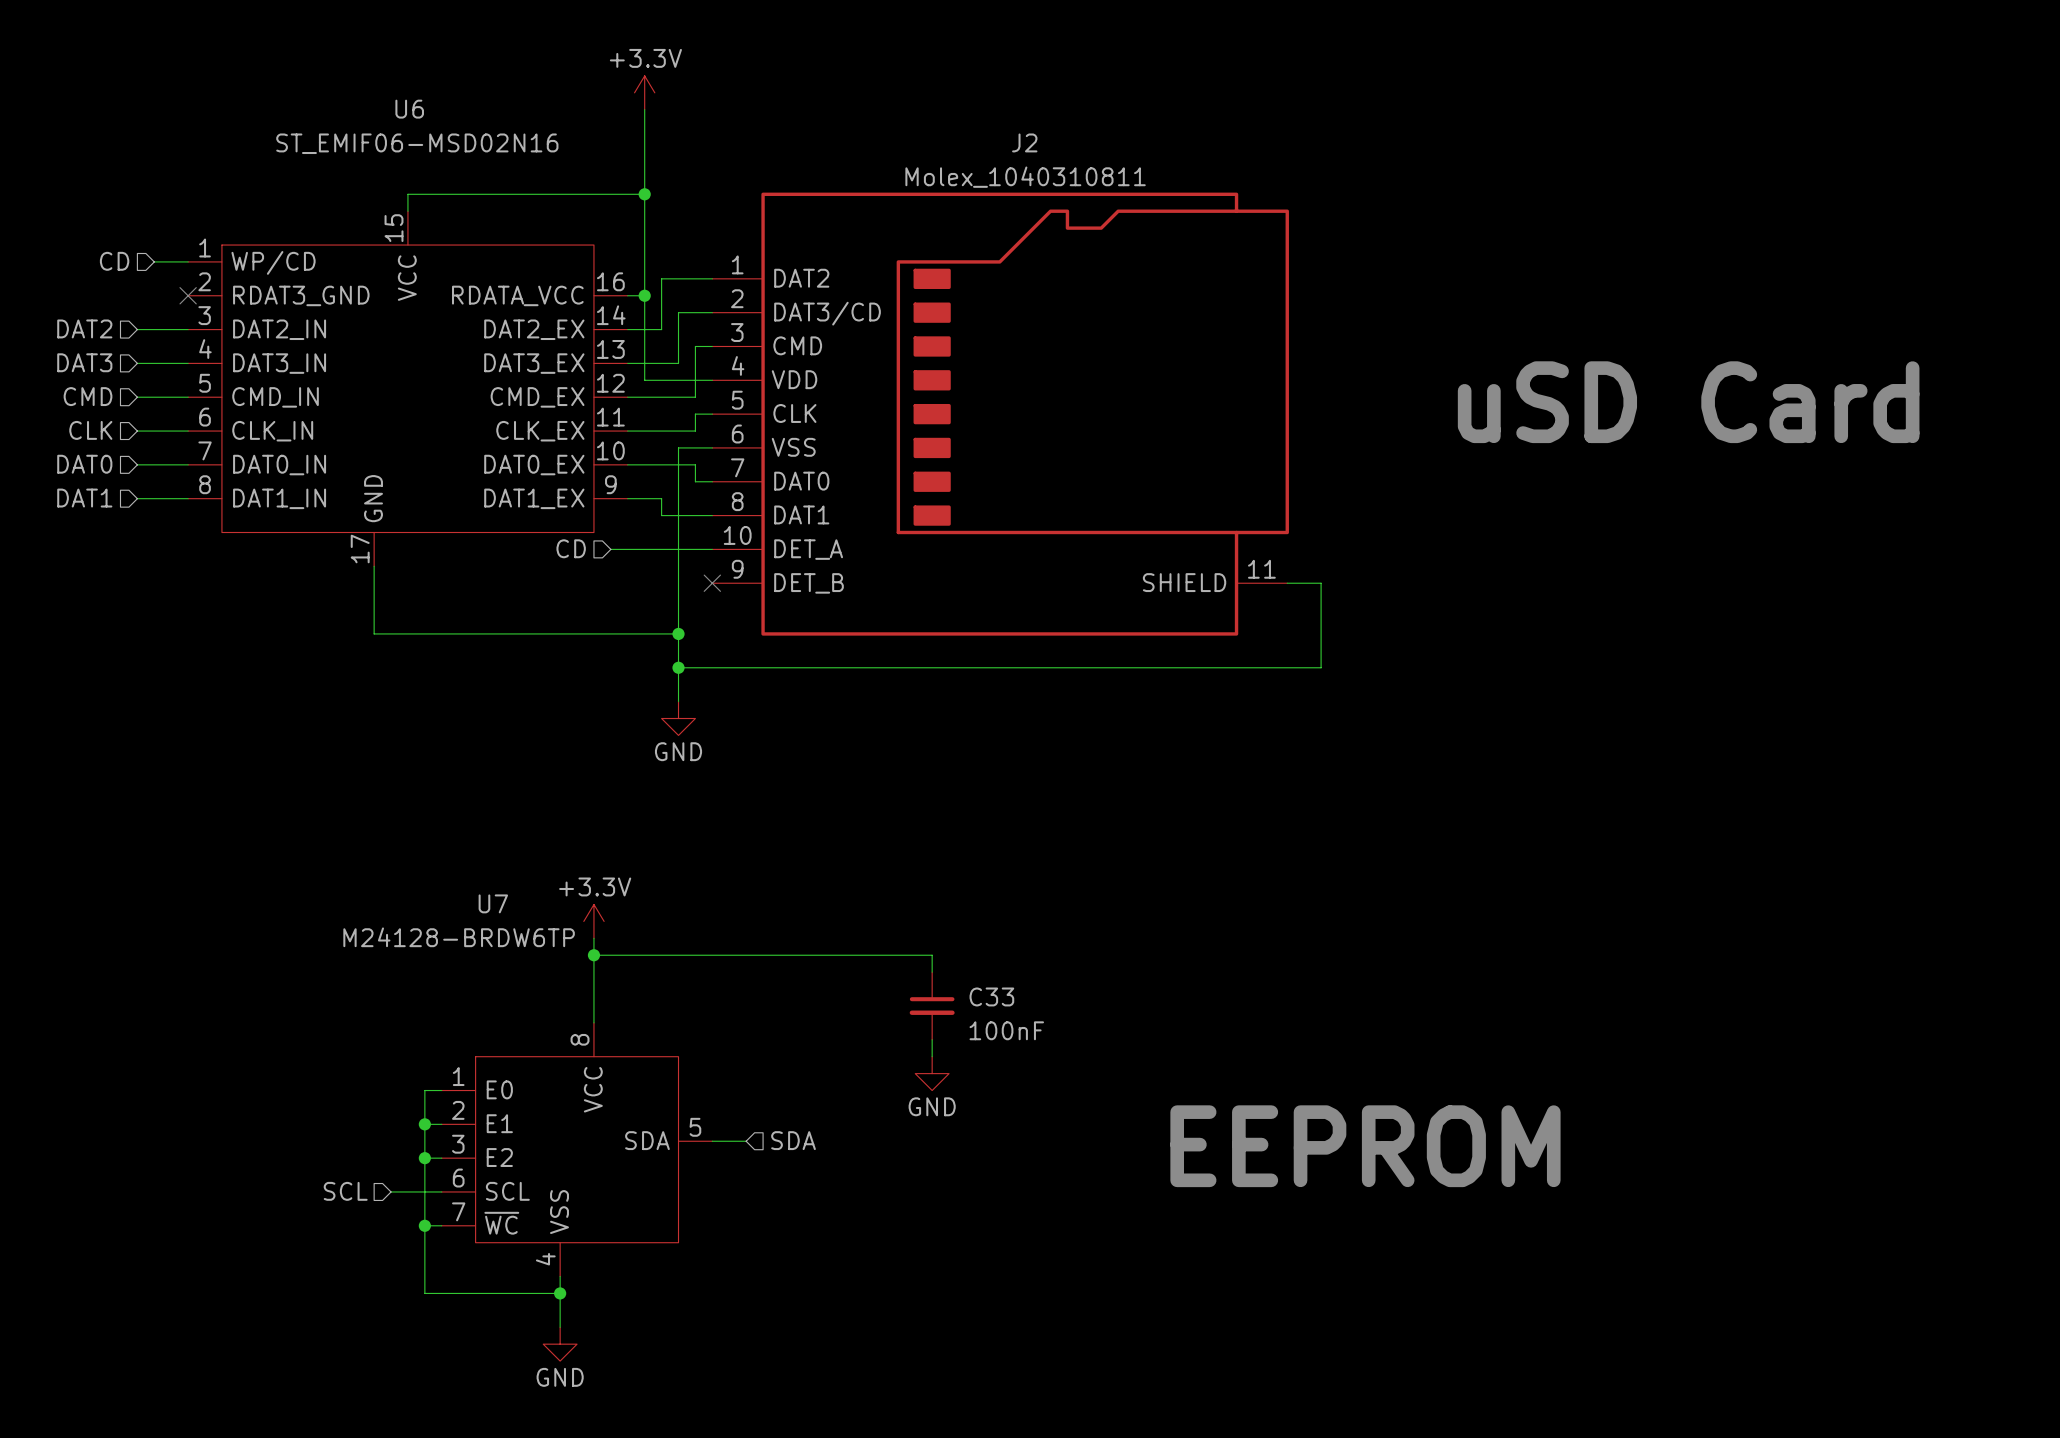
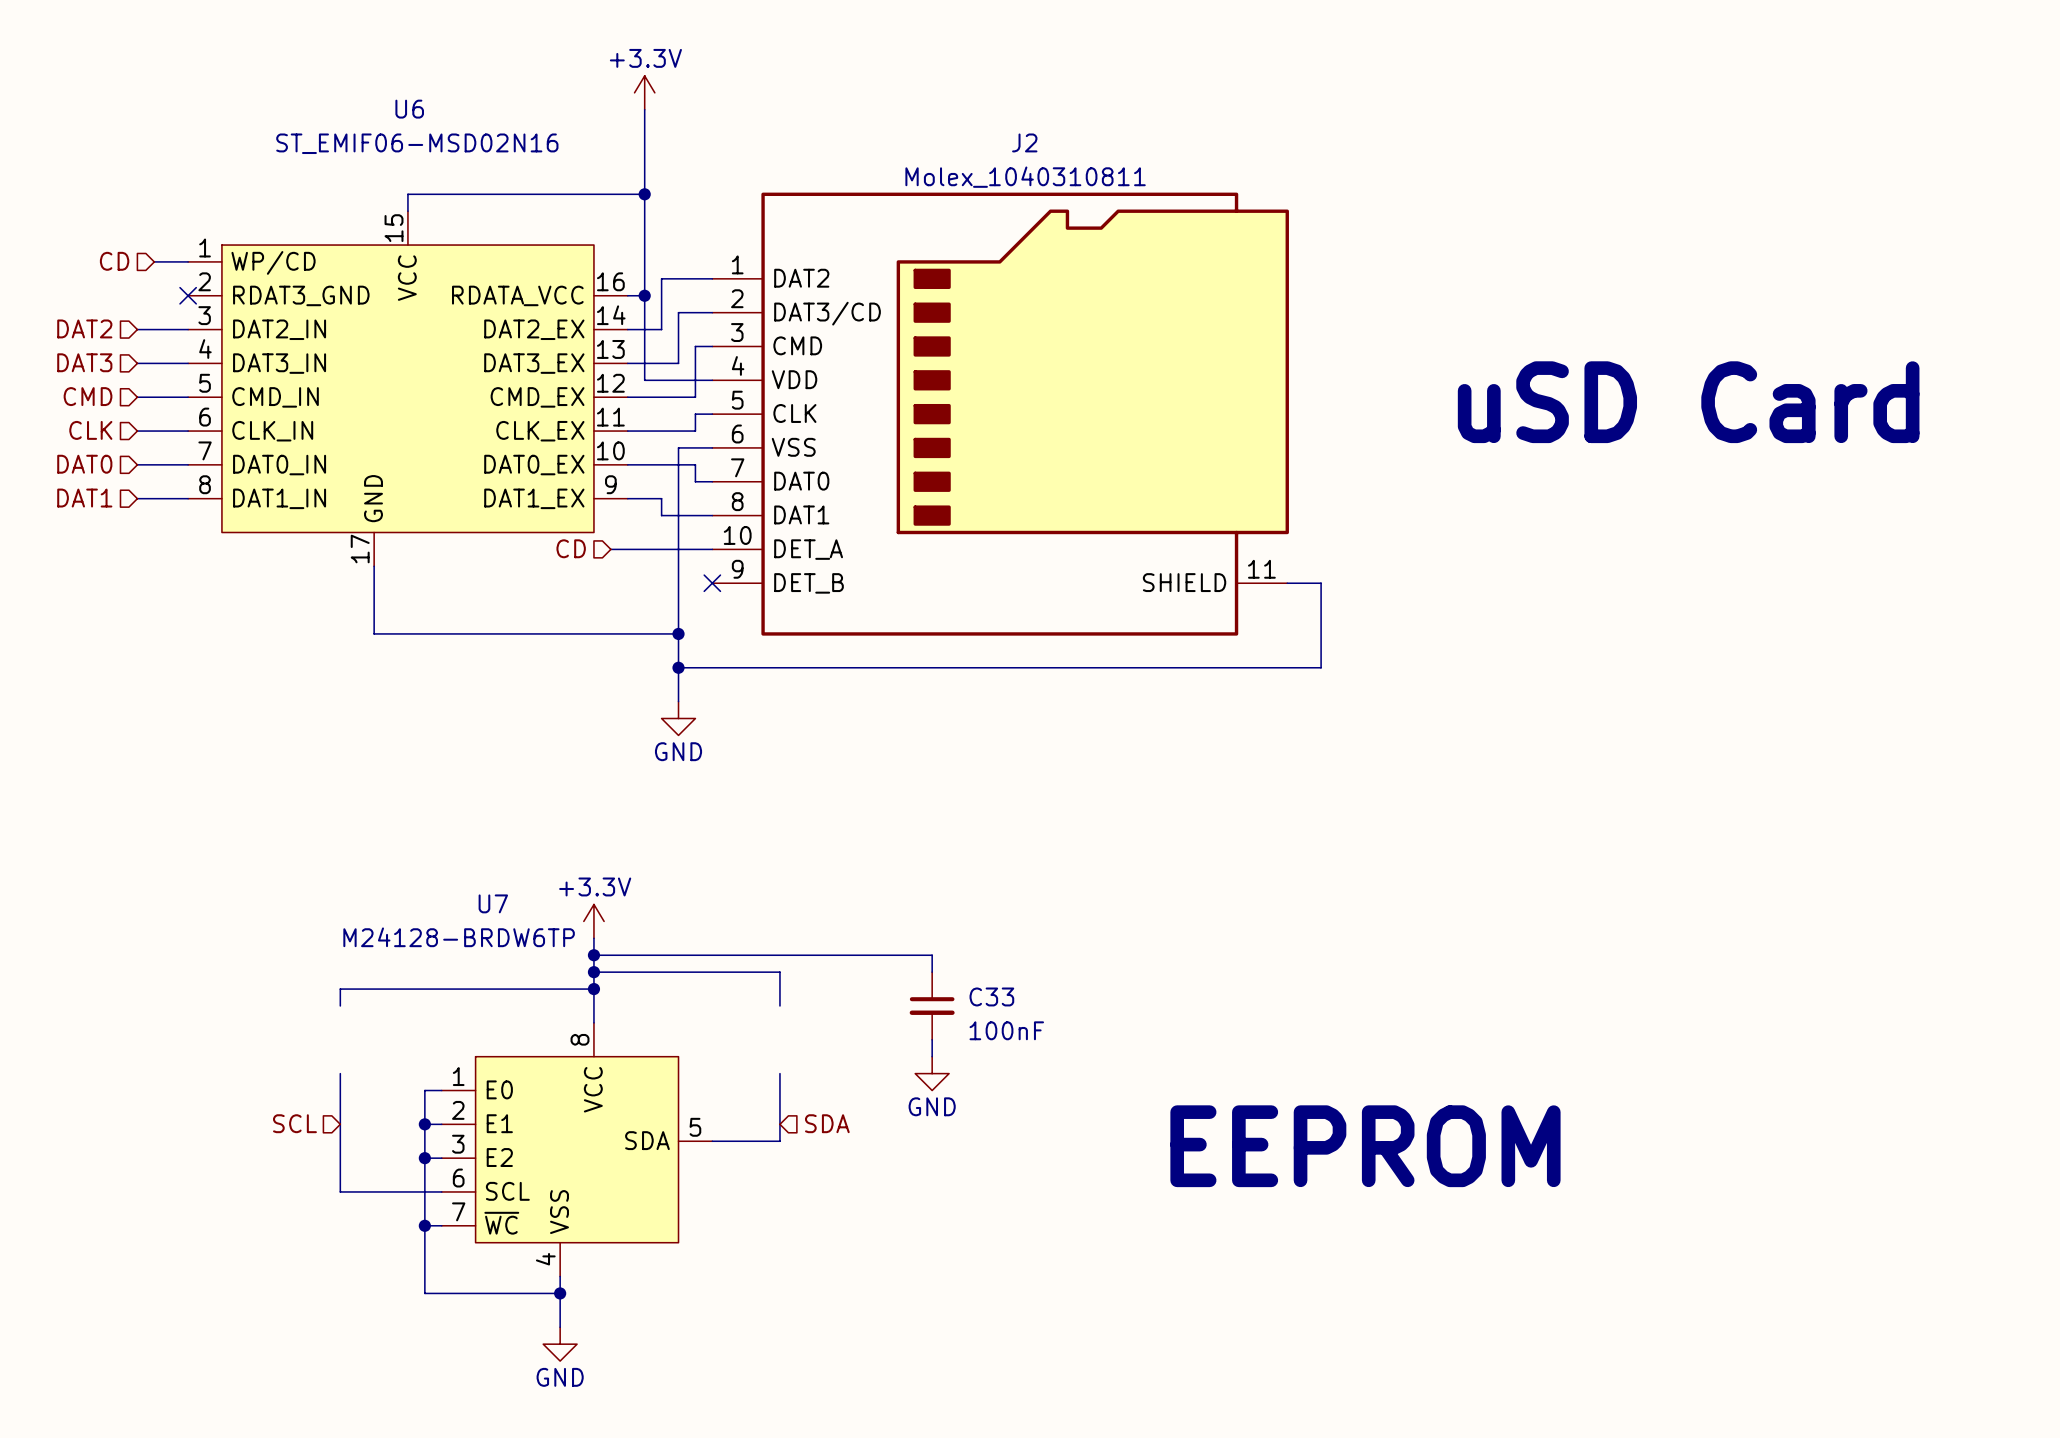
wire: none -> (593, 972) (779, 972) (779, 1005)
junction: none -> (593, 972)
wire: none -> (593, 989) (340, 989) (340, 1005)
junction: none -> (593, 989)
wire: none -> (340, 1073) (340, 1191) (391, 1191)
wire: none -> (779, 1073) (779, 1141) (746, 1141)
hierarchical label position: SDA (793, 1140) -> SDA (827, 1123)
hierarchical label position: SCL (345, 1191) -> SCL (294, 1123)

